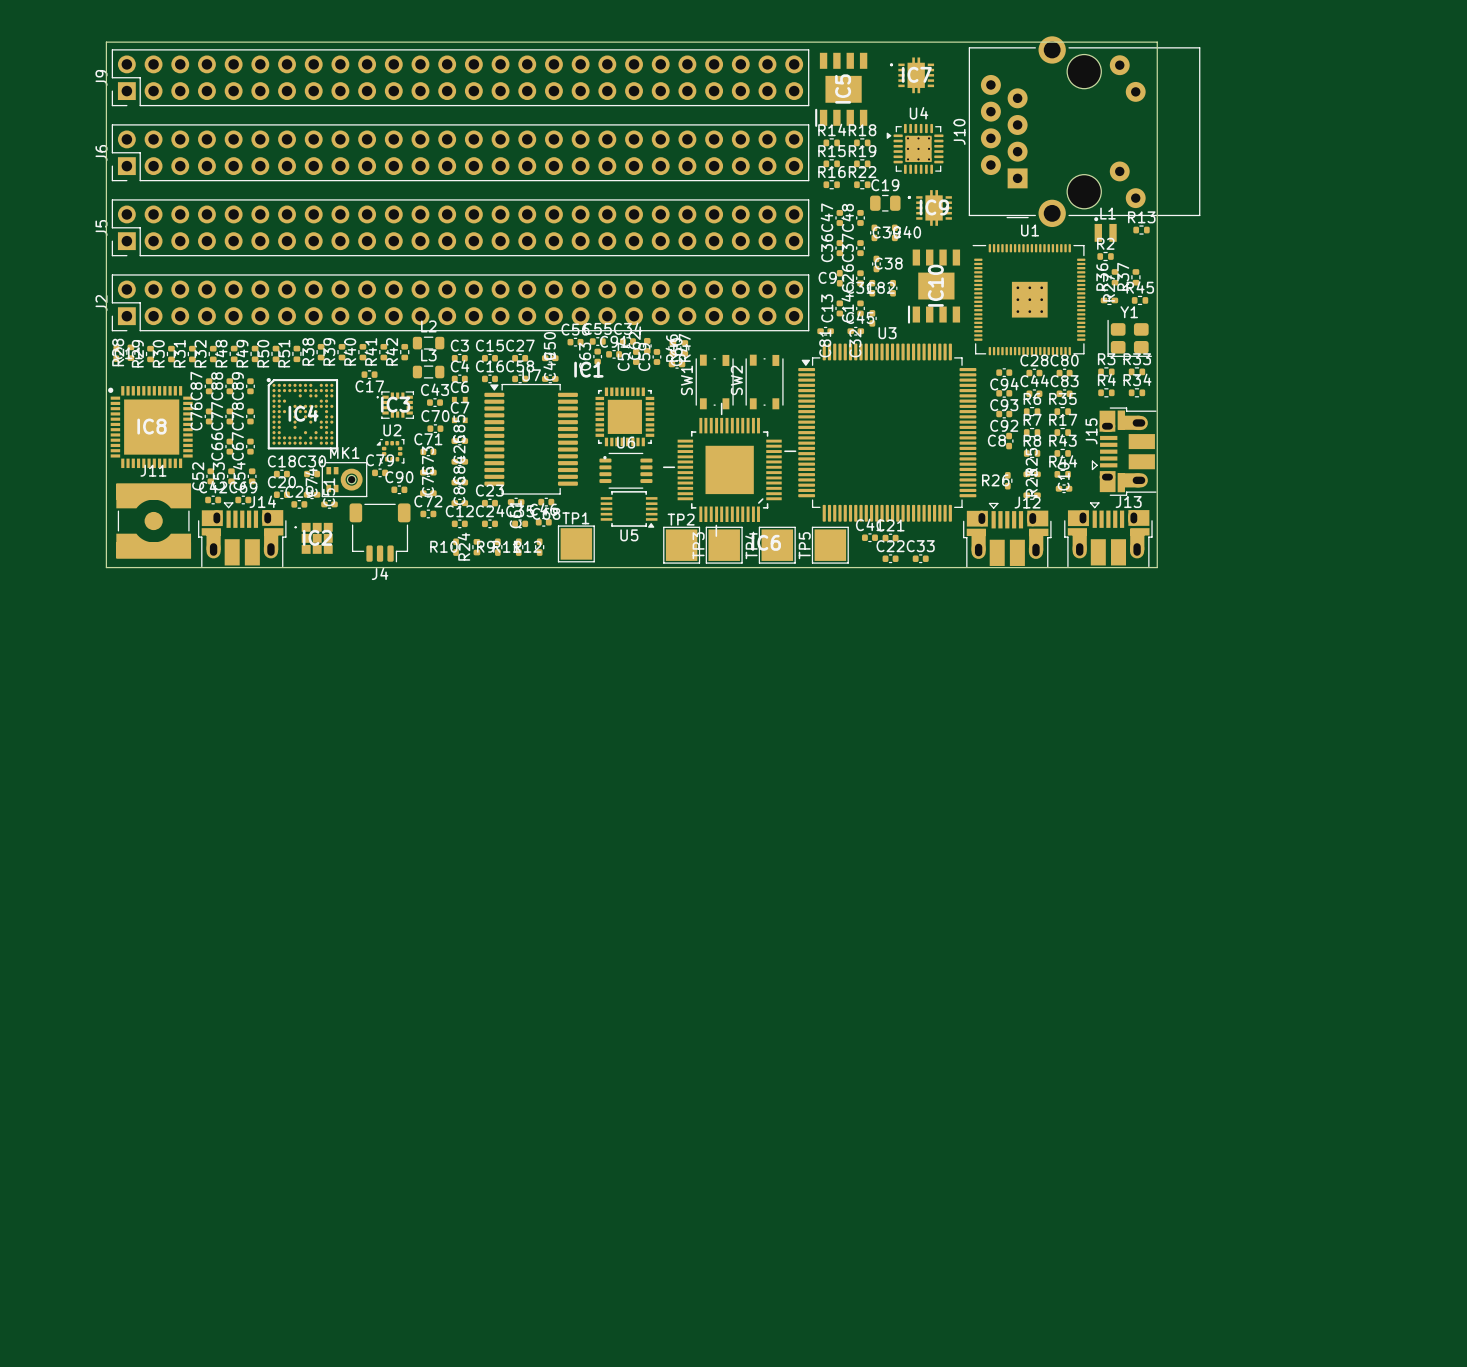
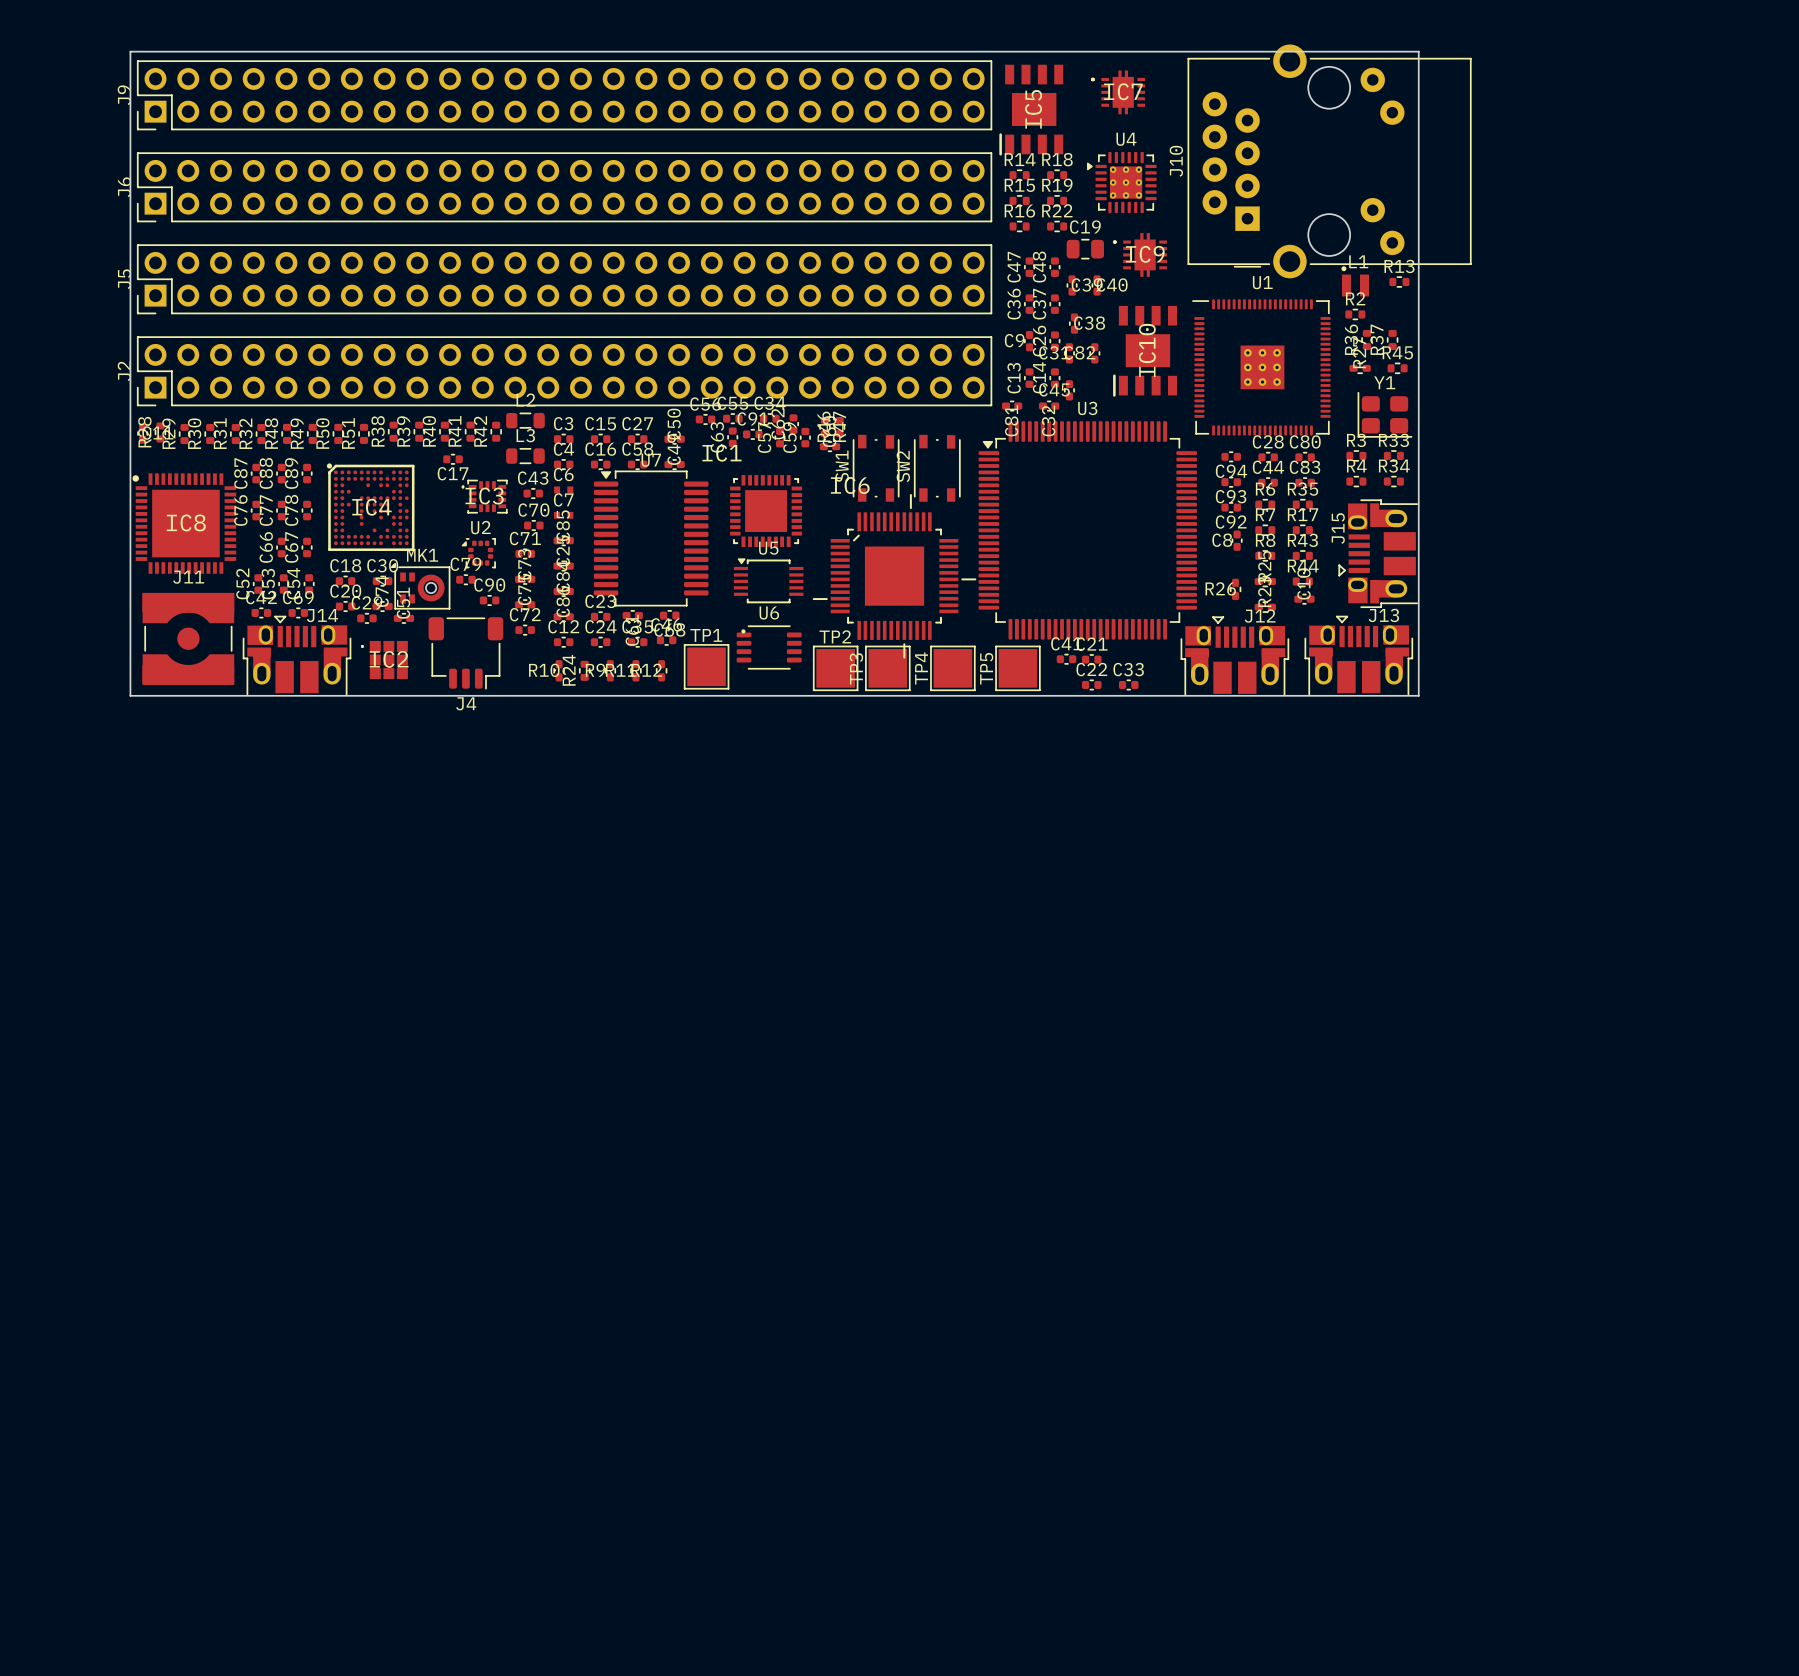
IC6 rotation: 0° (729, 469) -> 180° (894, 576)
U6 position: (625, 470) -> (769, 647)
U5 rotation: 0° (629, 509) -> 180° (768, 580)
U5 position: (629, 509) -> (768, 580)

